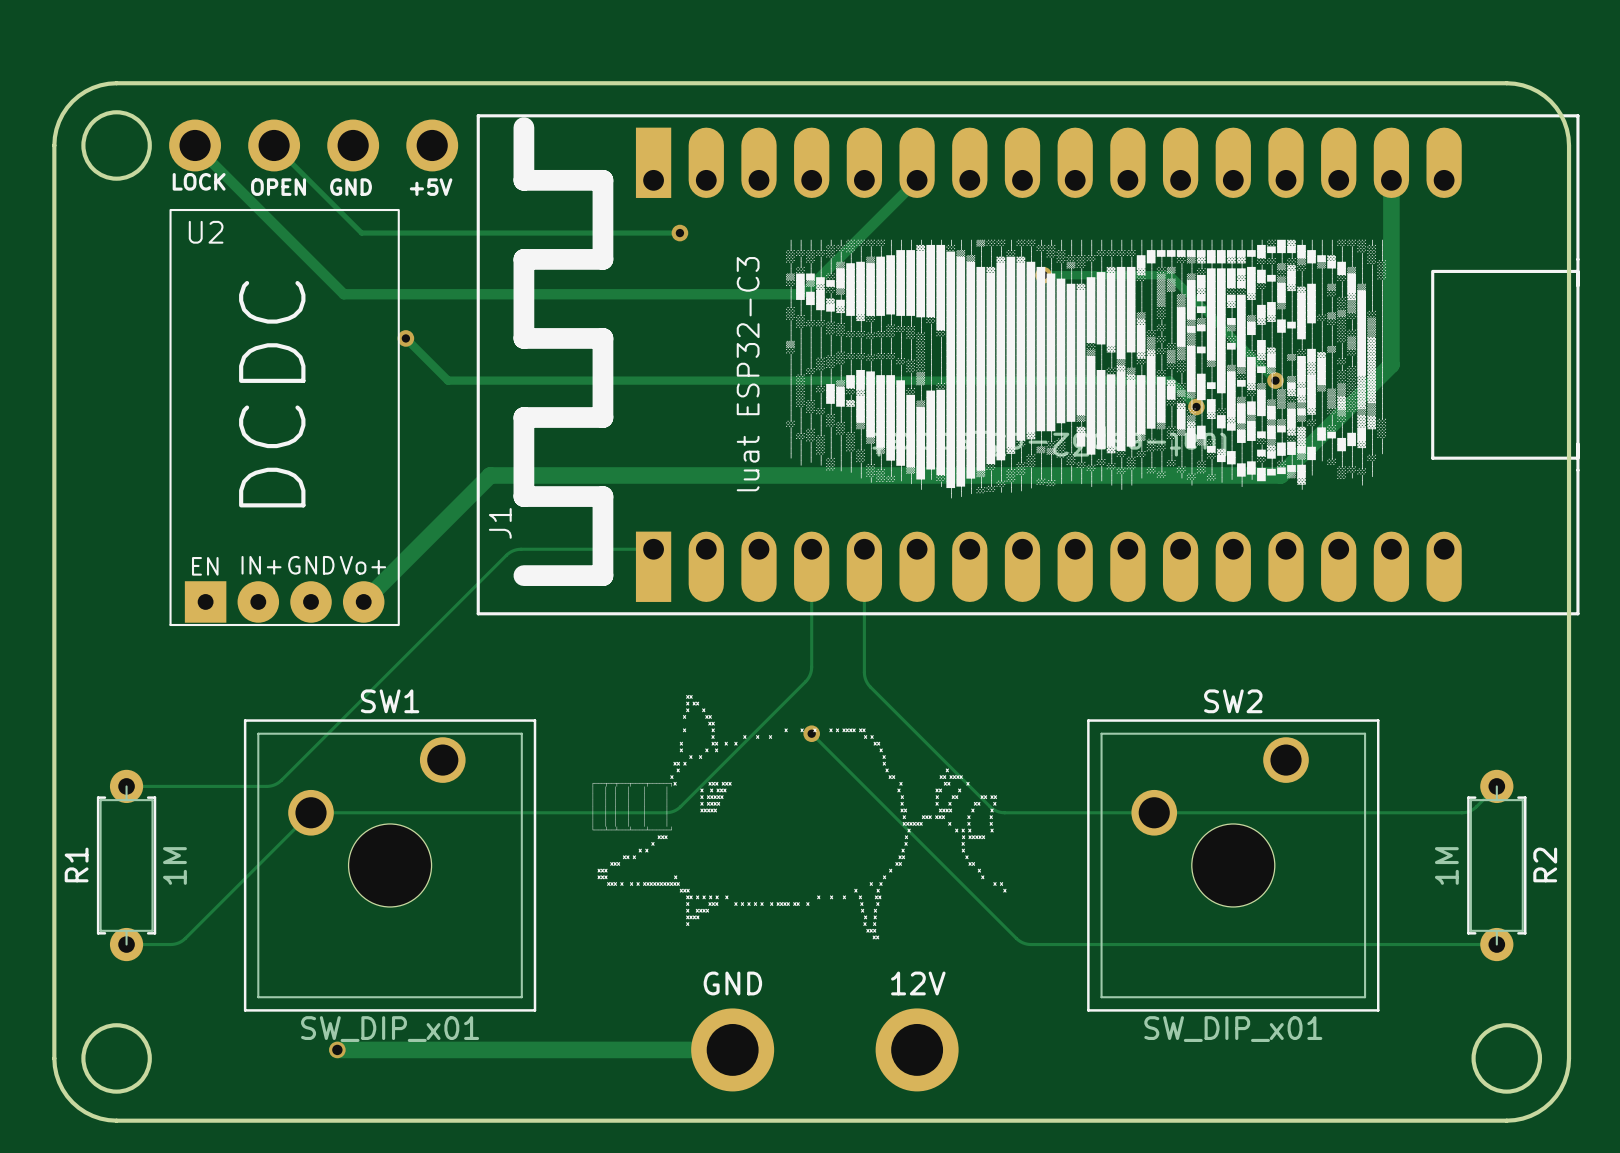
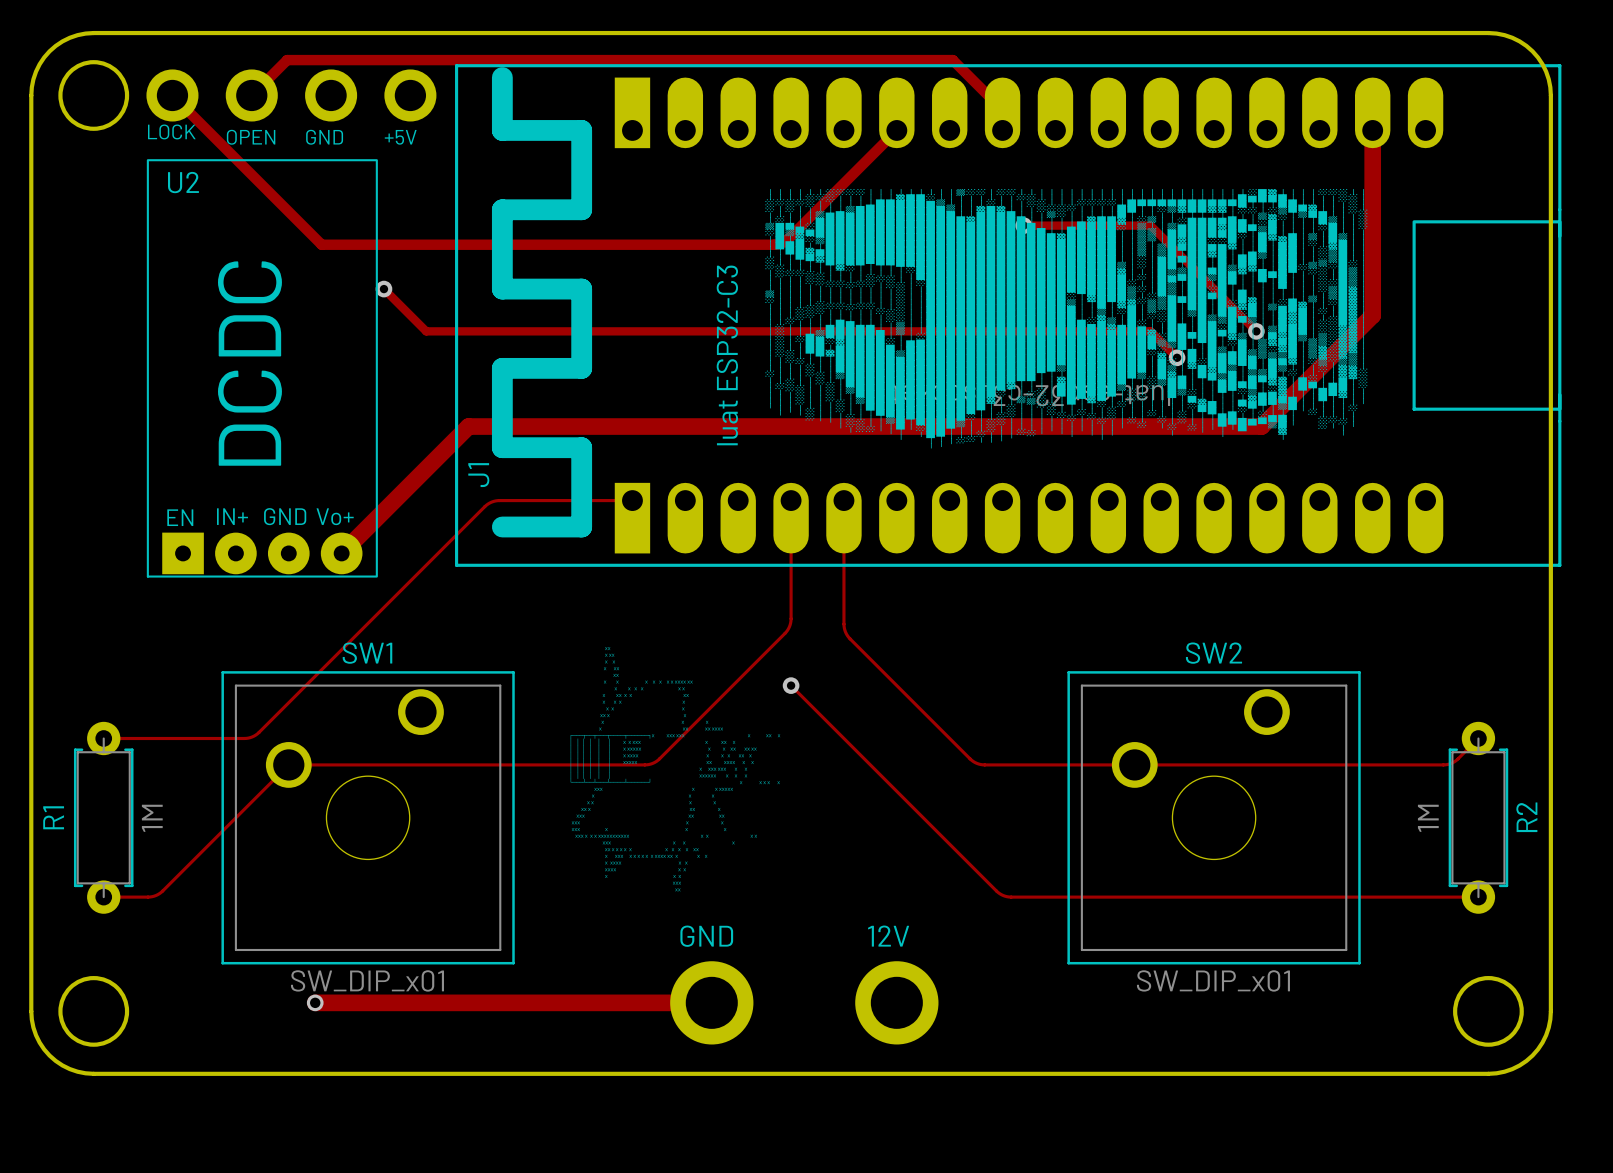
track: (274, 145) (361, 233) (679, 233) -> (251, 95) (287, 60) (952, 60) (1002, 109)
via: (679, 233) -> none

